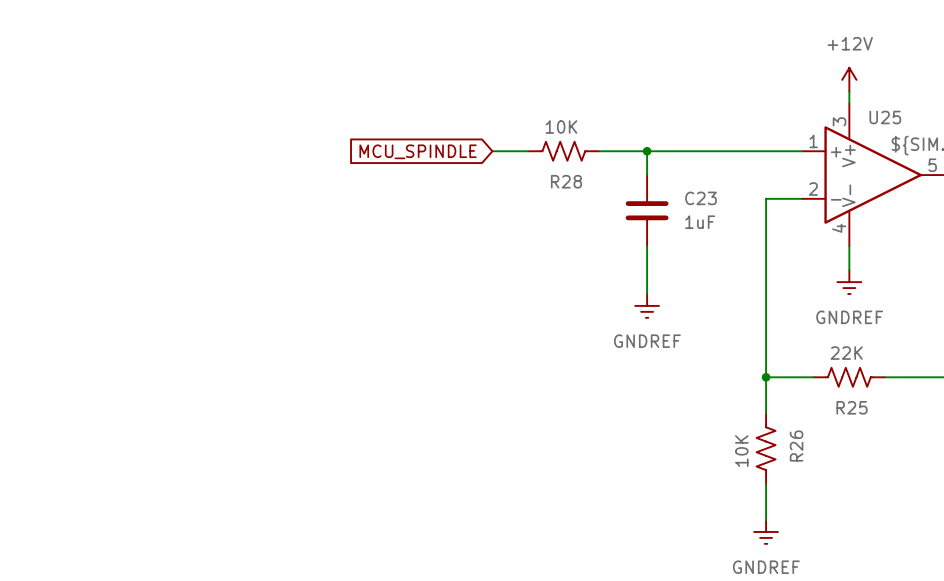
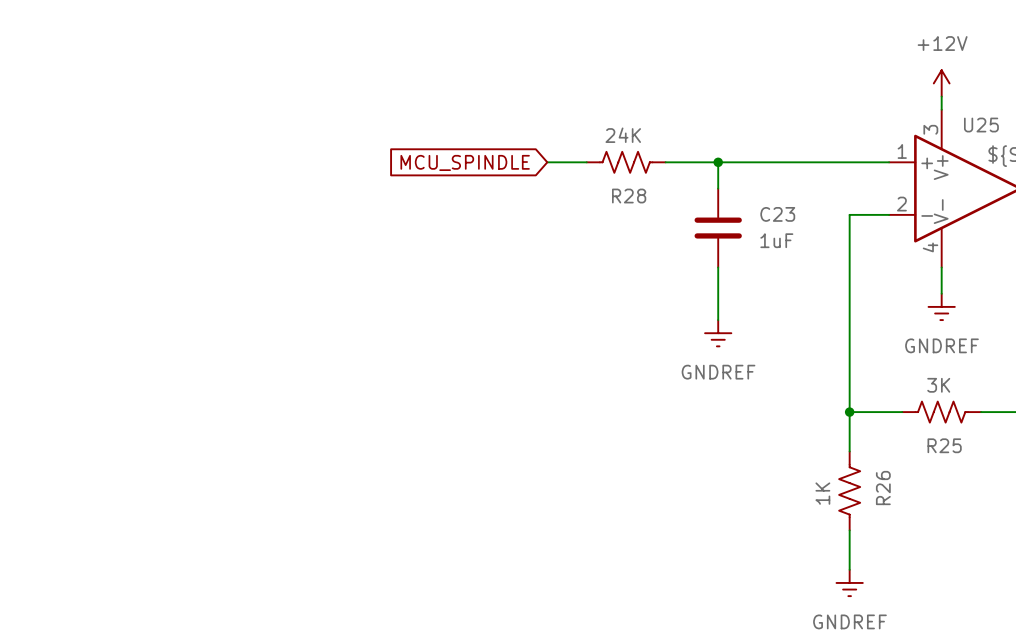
R28 value: 10K (561, 127) -> 24K (623, 135)
R25 value: 22K (846, 353) -> 3K (938, 385)
R26 value: 10K (741, 451) -> 1K (822, 493)

